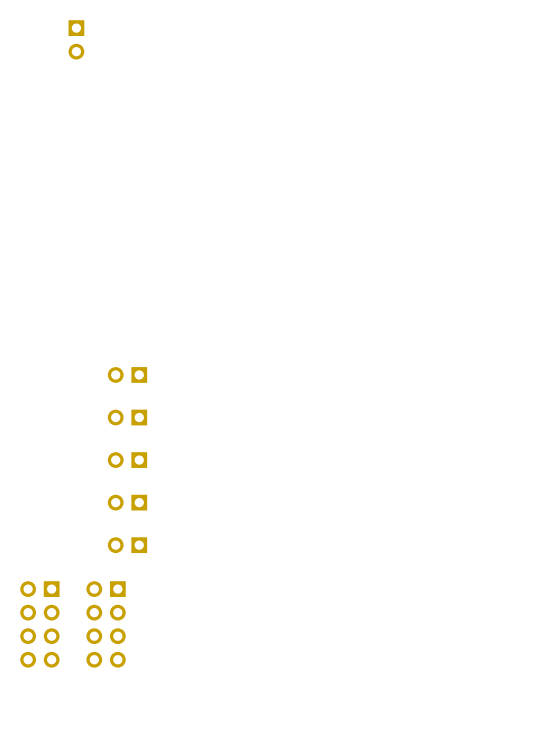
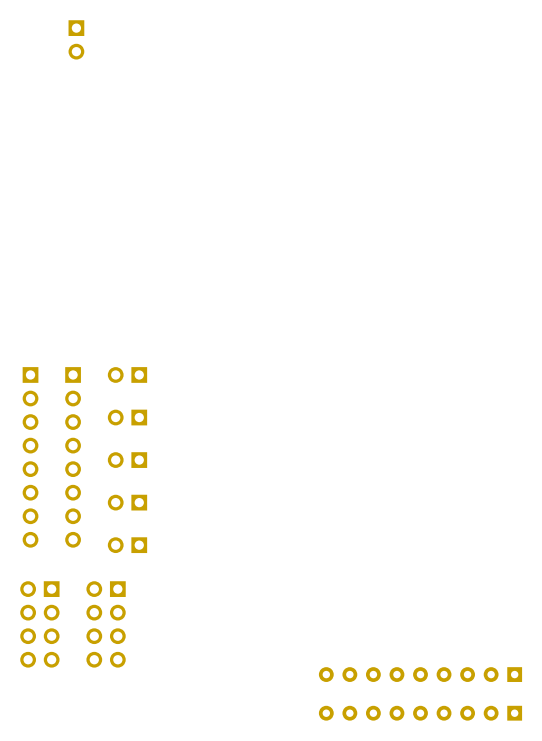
part: none -> (30, 457)
part: none -> (73, 457)
part: none -> (420, 674)
part: none -> (420, 713)

